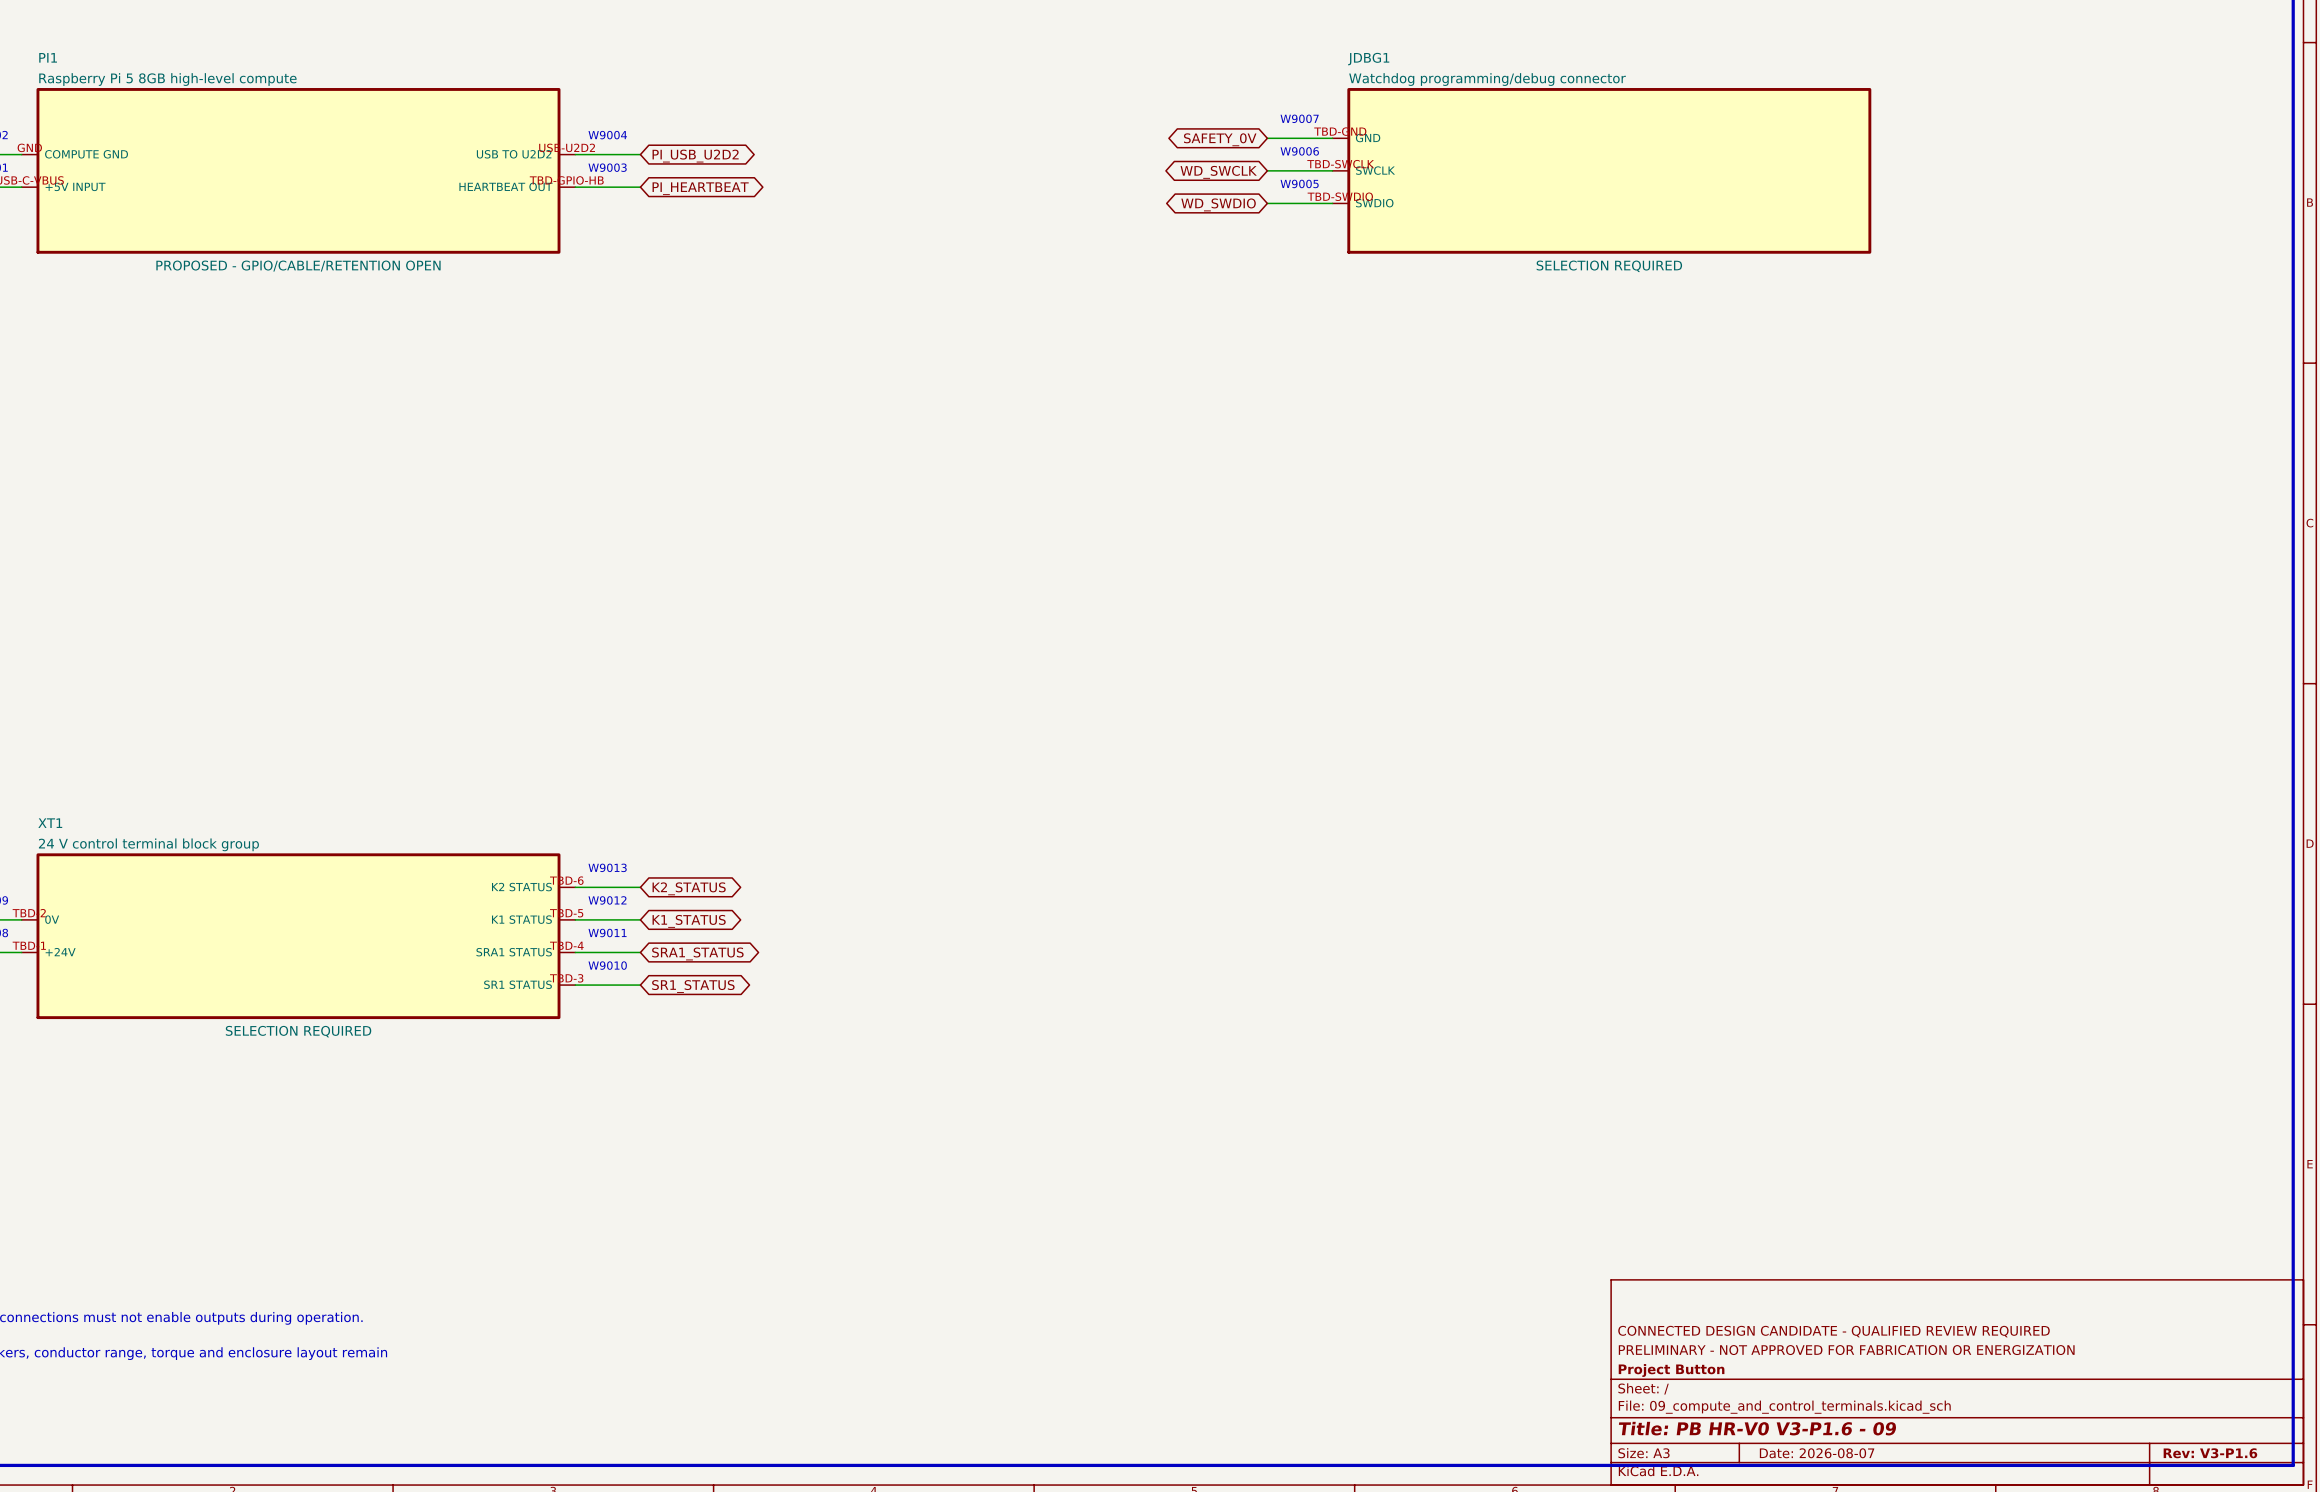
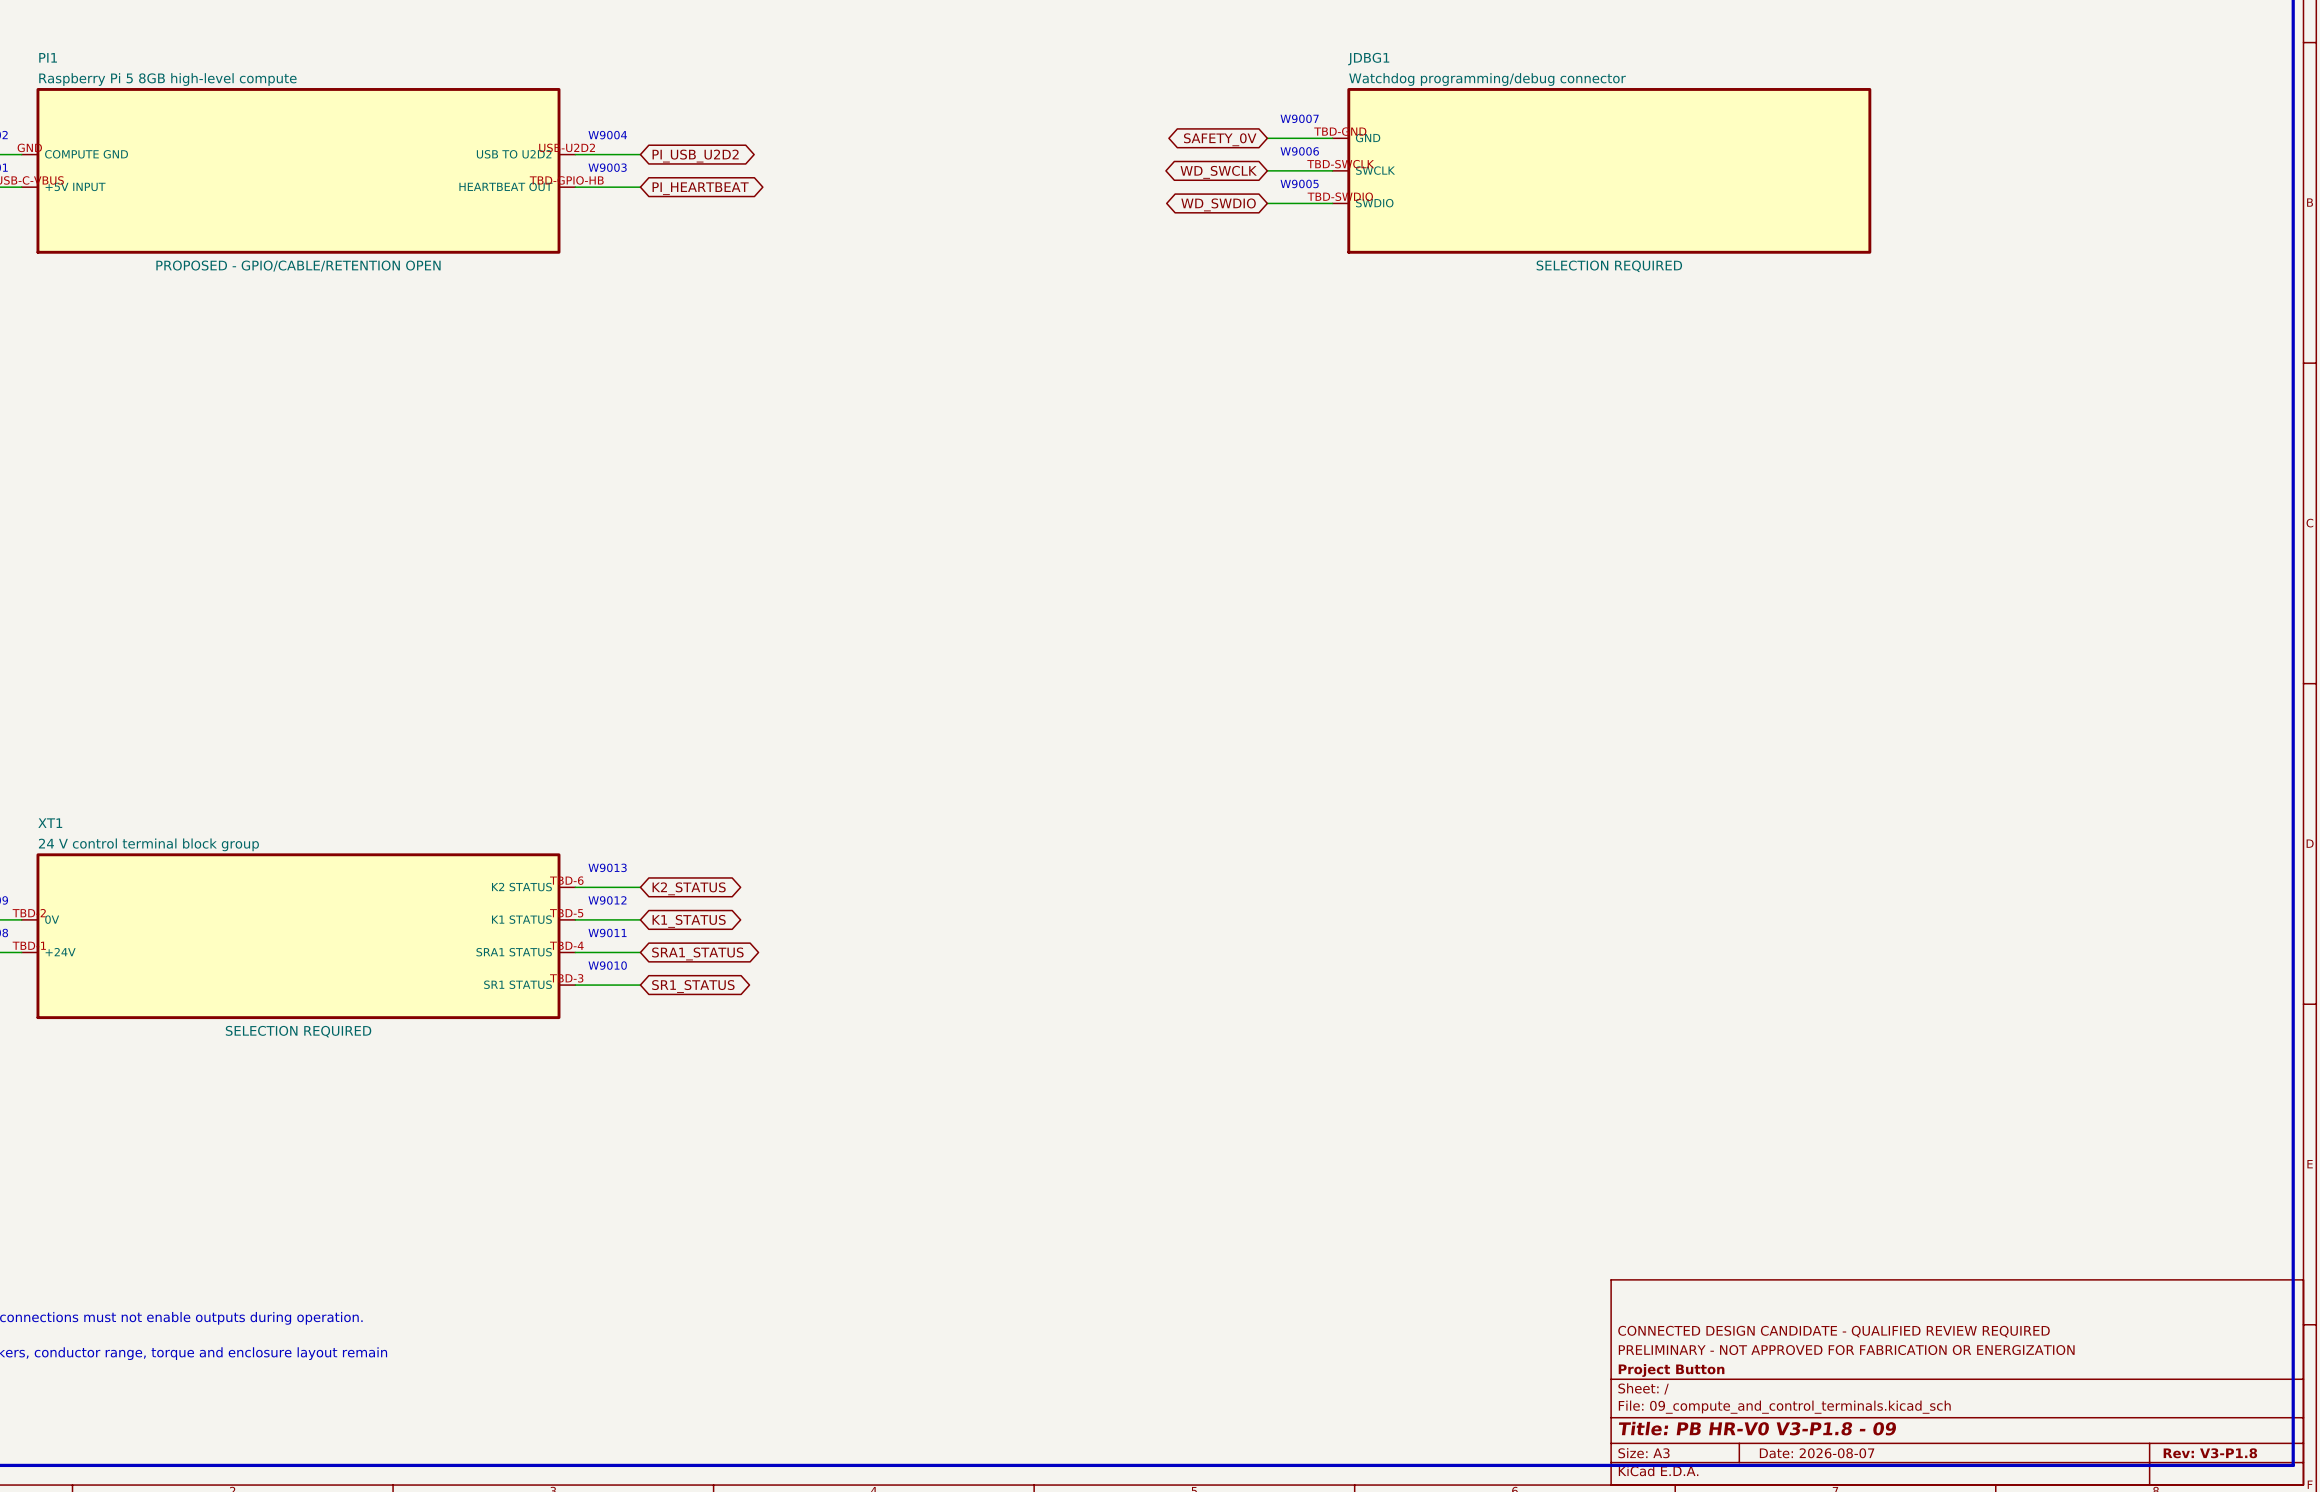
title block: Title: PB HR-V0 V3-P1.6 - 09 (1757, 1428) -> Title: PB HR-V0 V3-P1.8 - 09 (1757, 1428)
title block: Rev: V3-P1.6 (2210, 1453) -> Rev: V3-P1.8 (2210, 1453)

